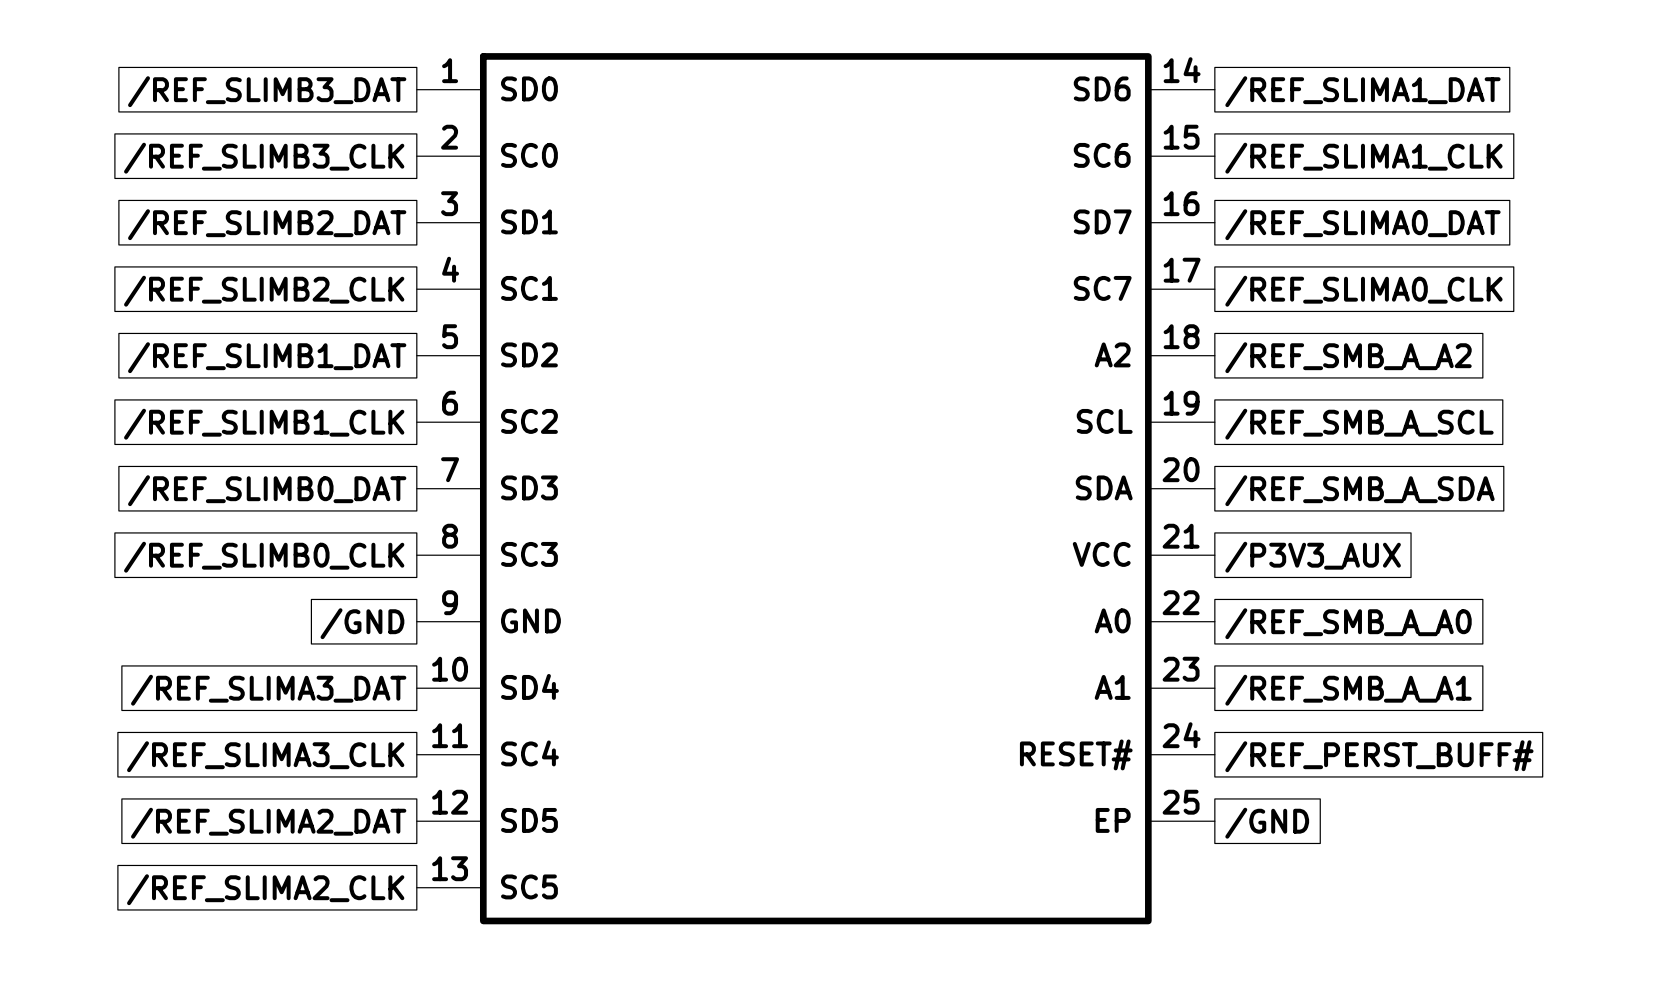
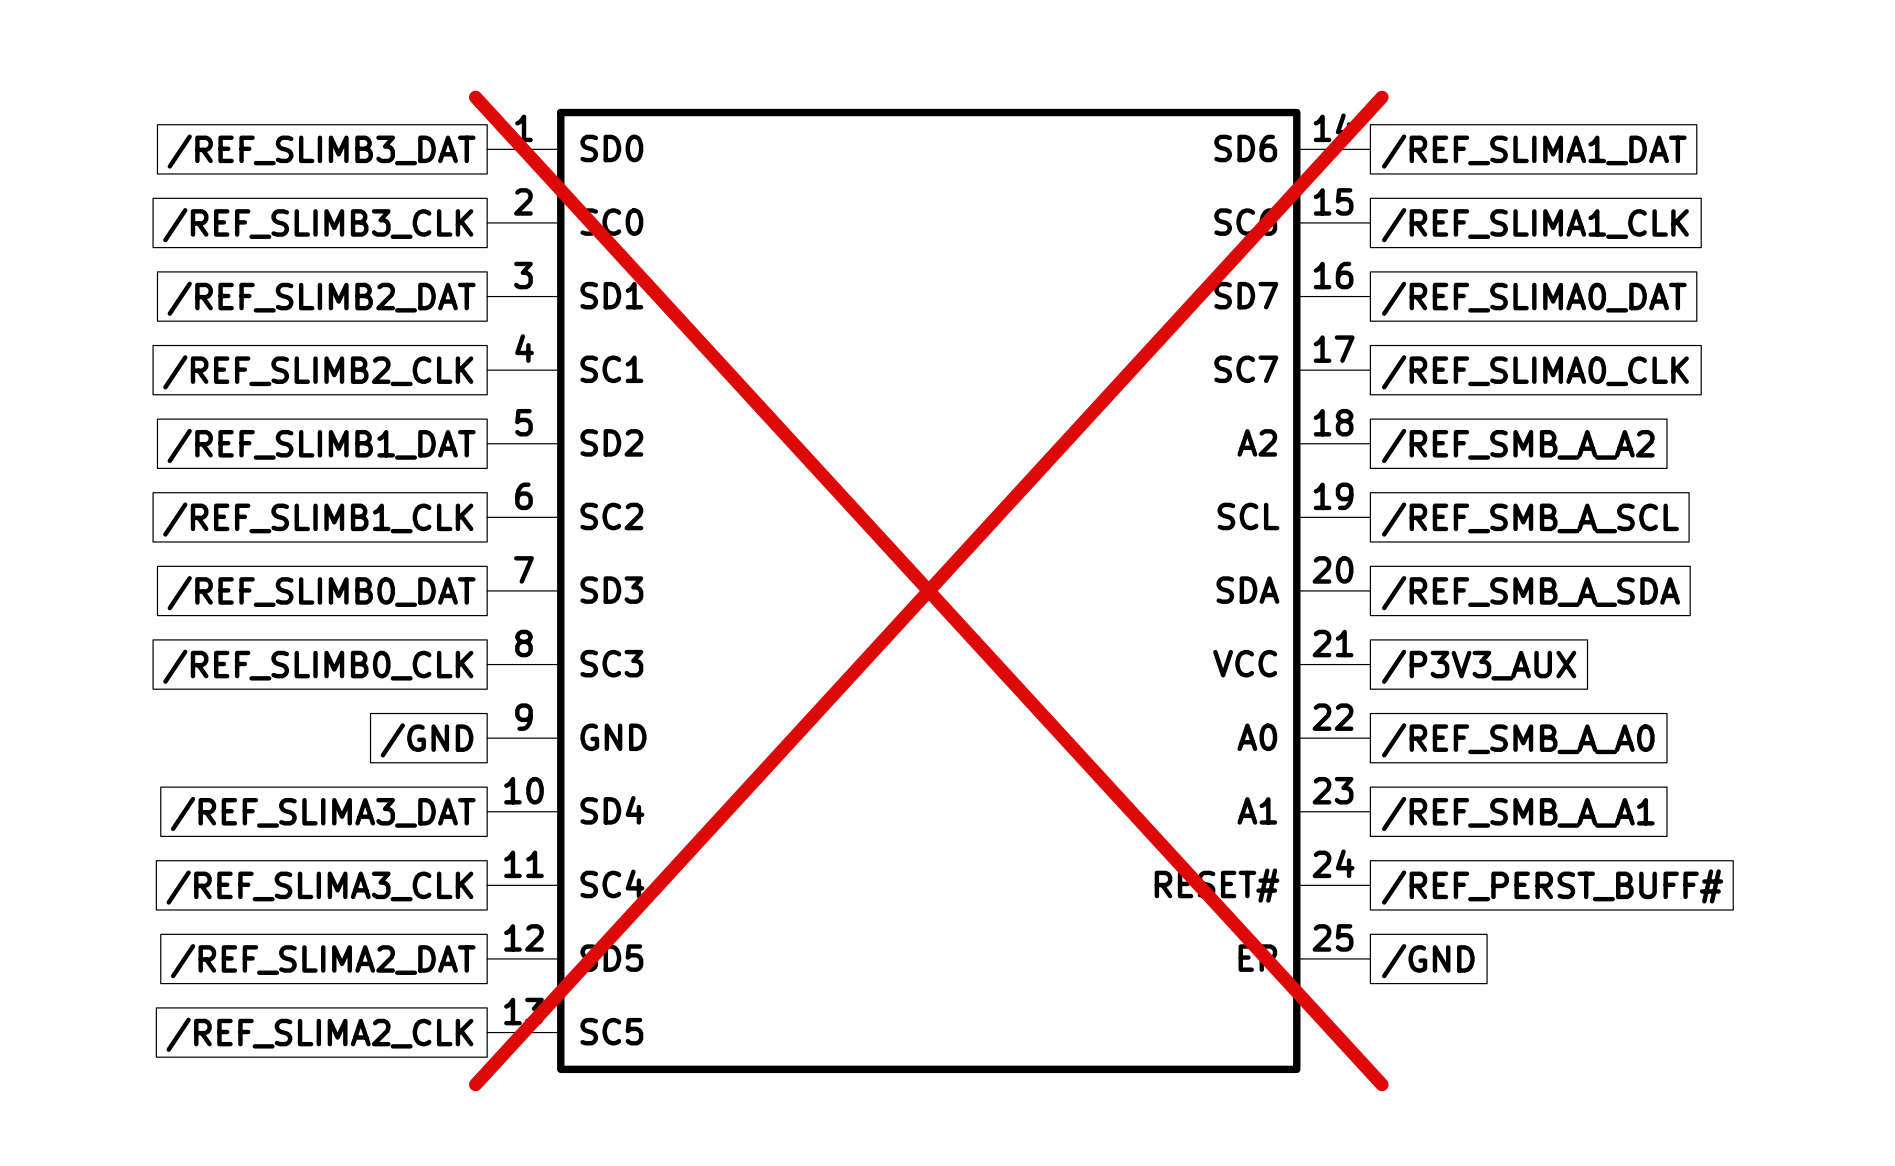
part do-not-place cross: none -> (928, 590)

